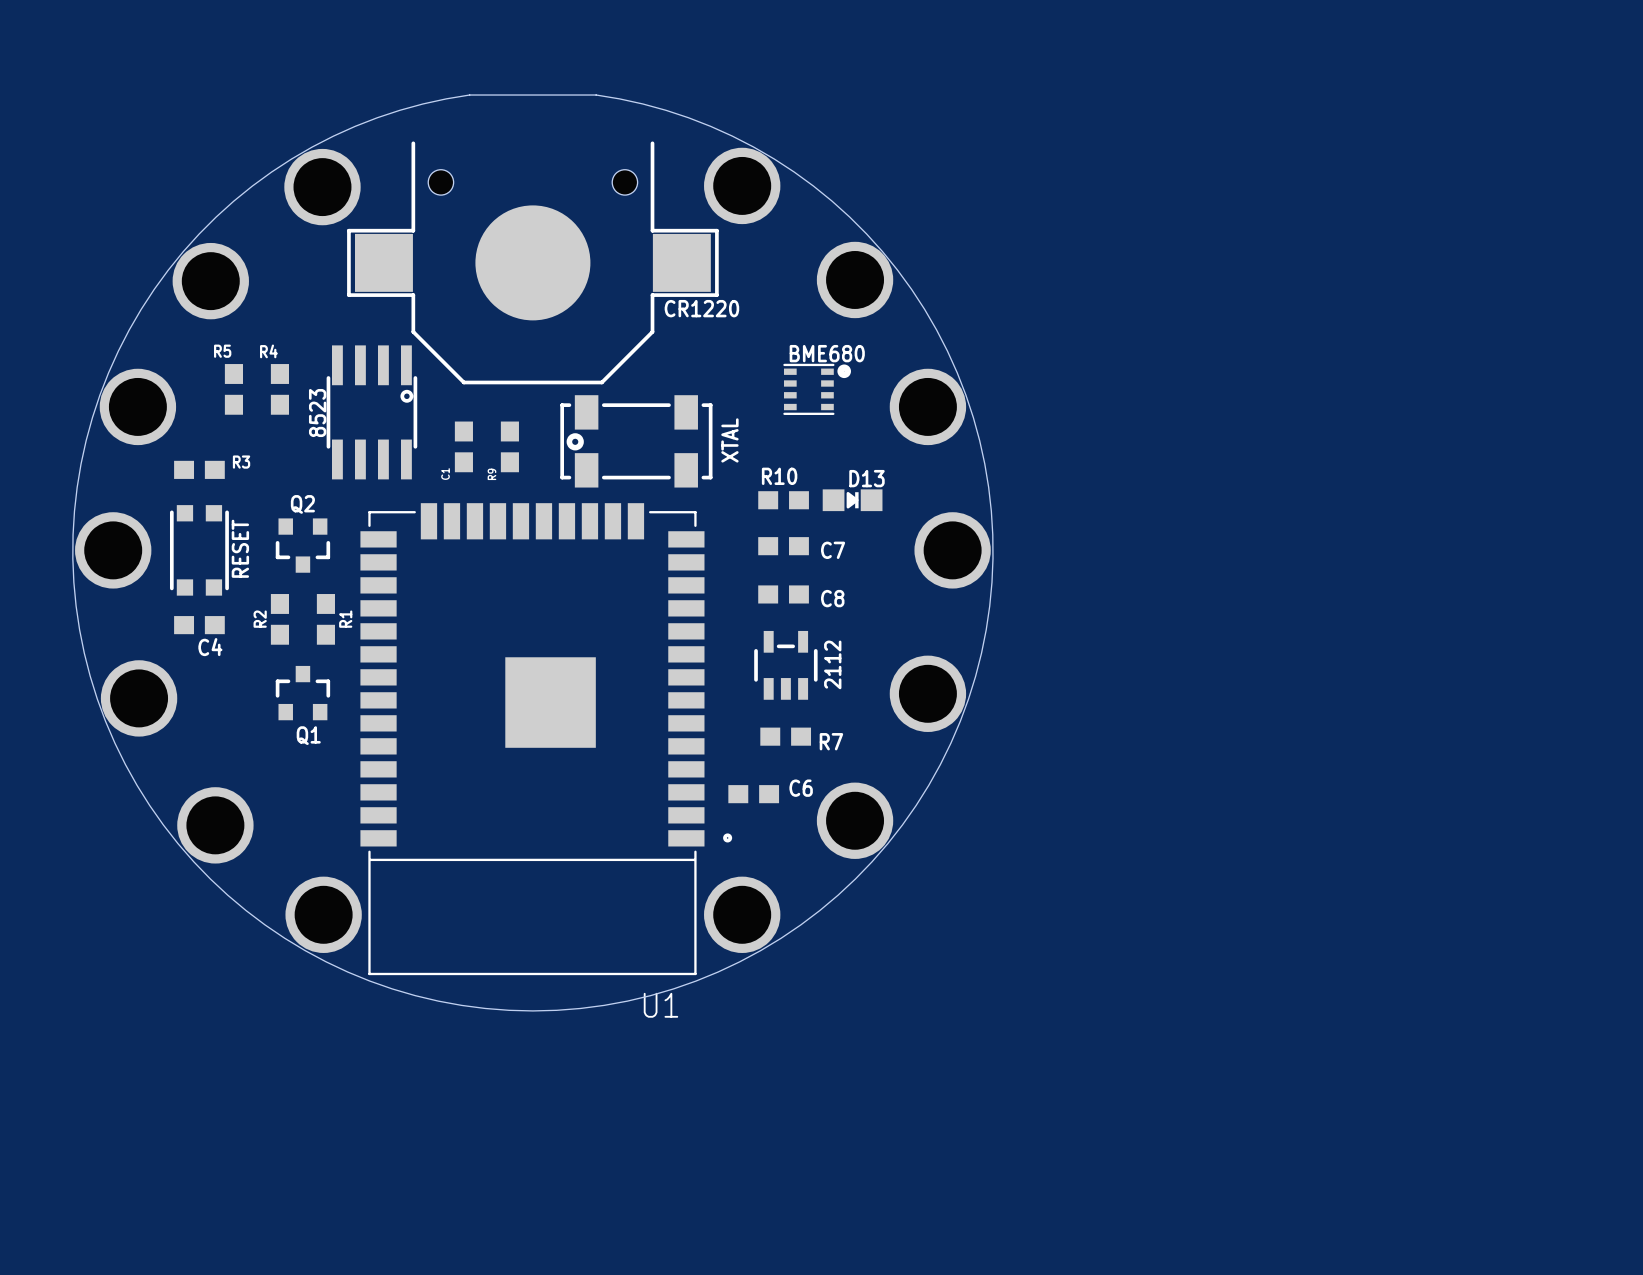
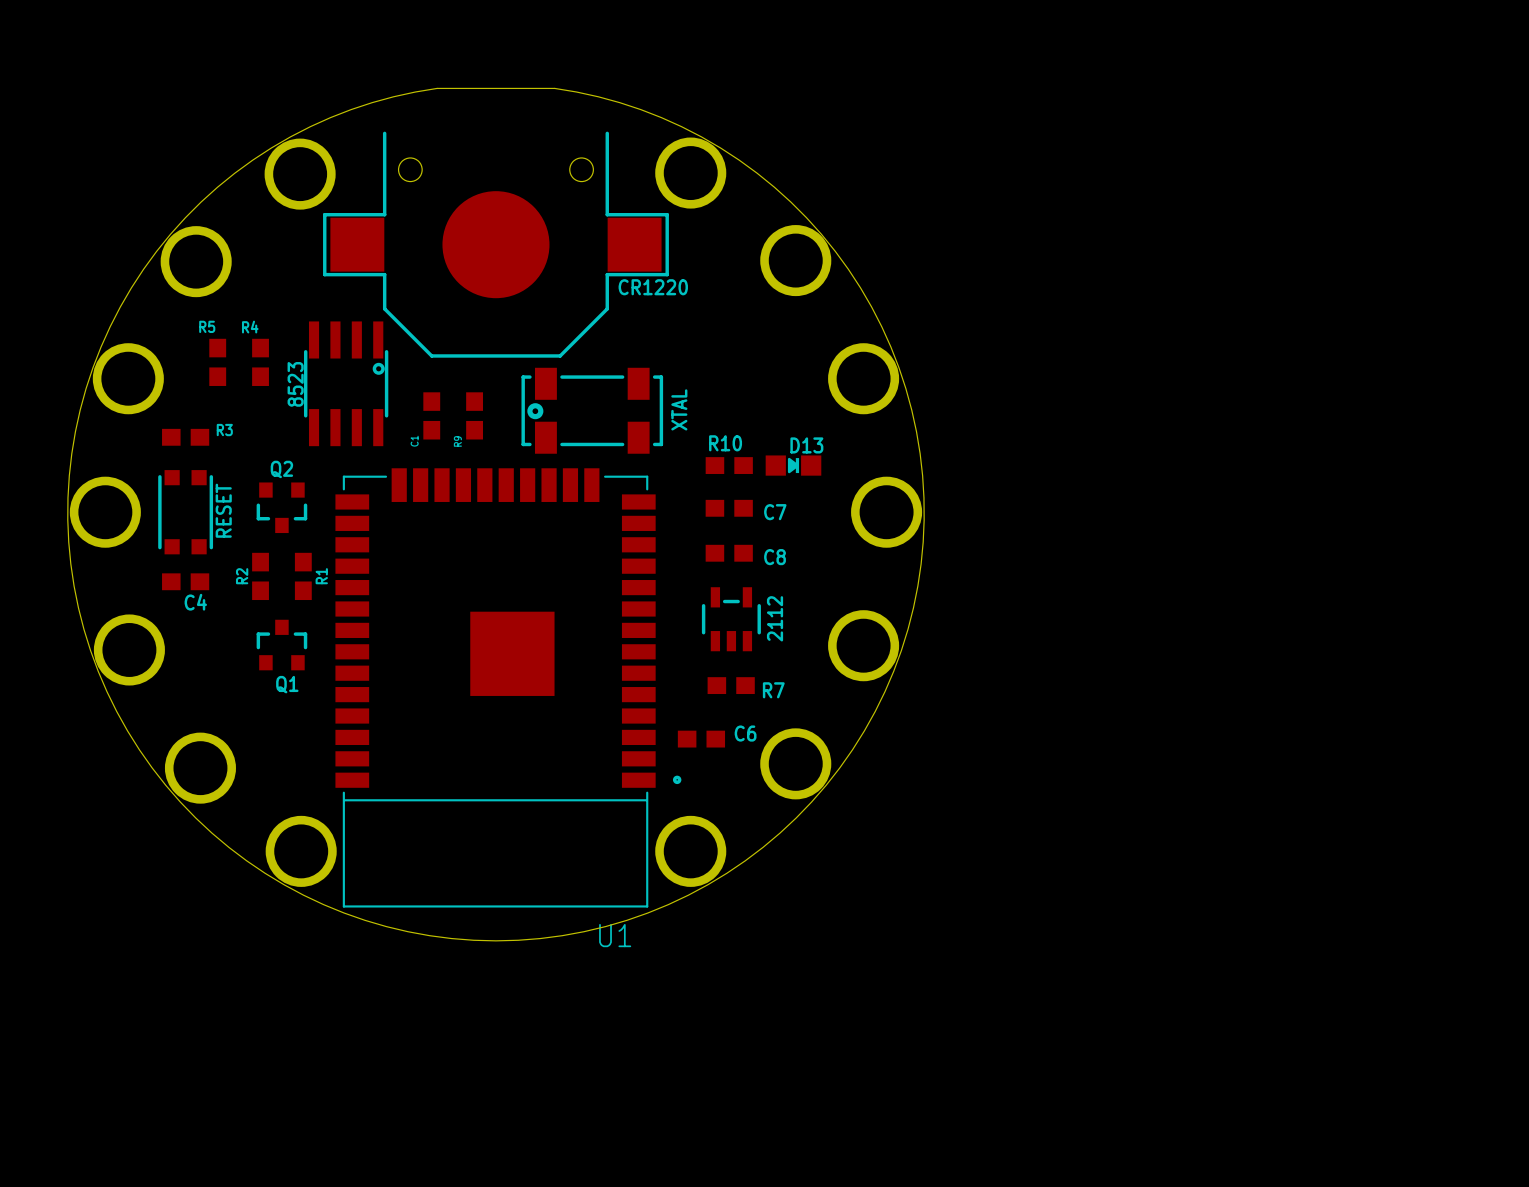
BME680: (817, 389) -> none

